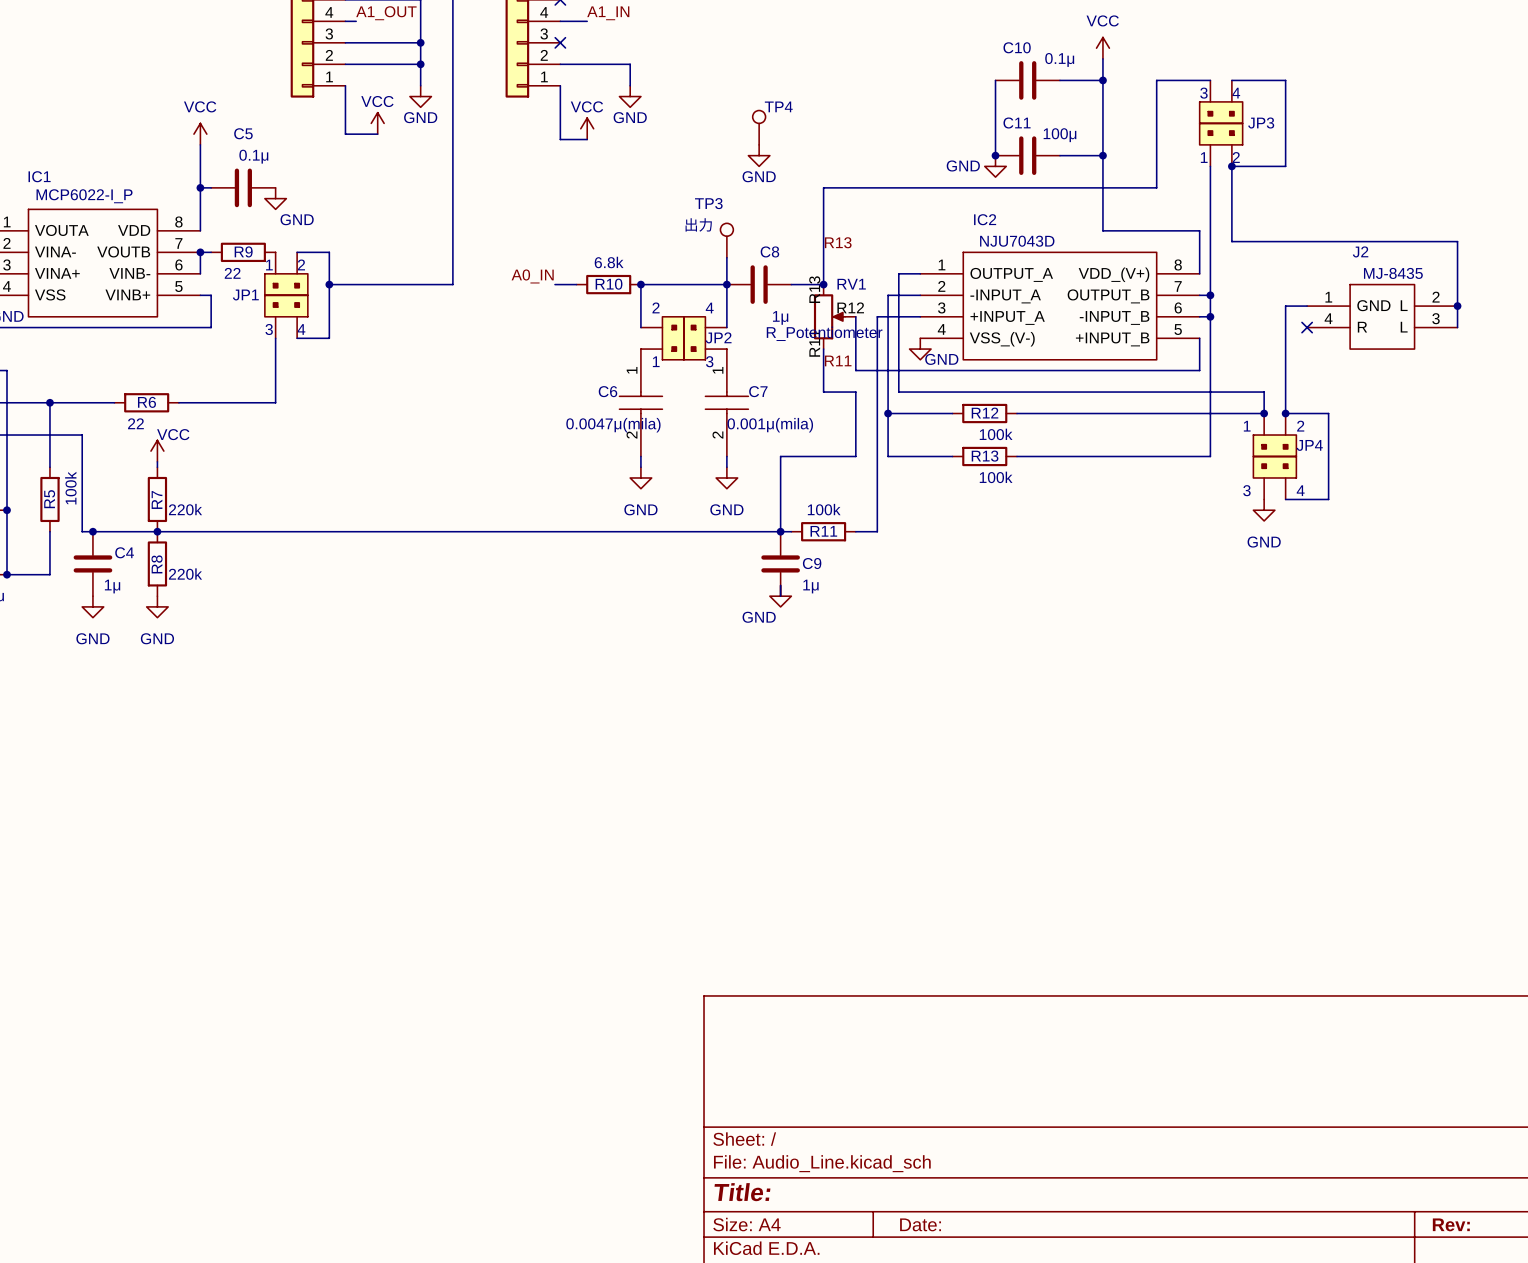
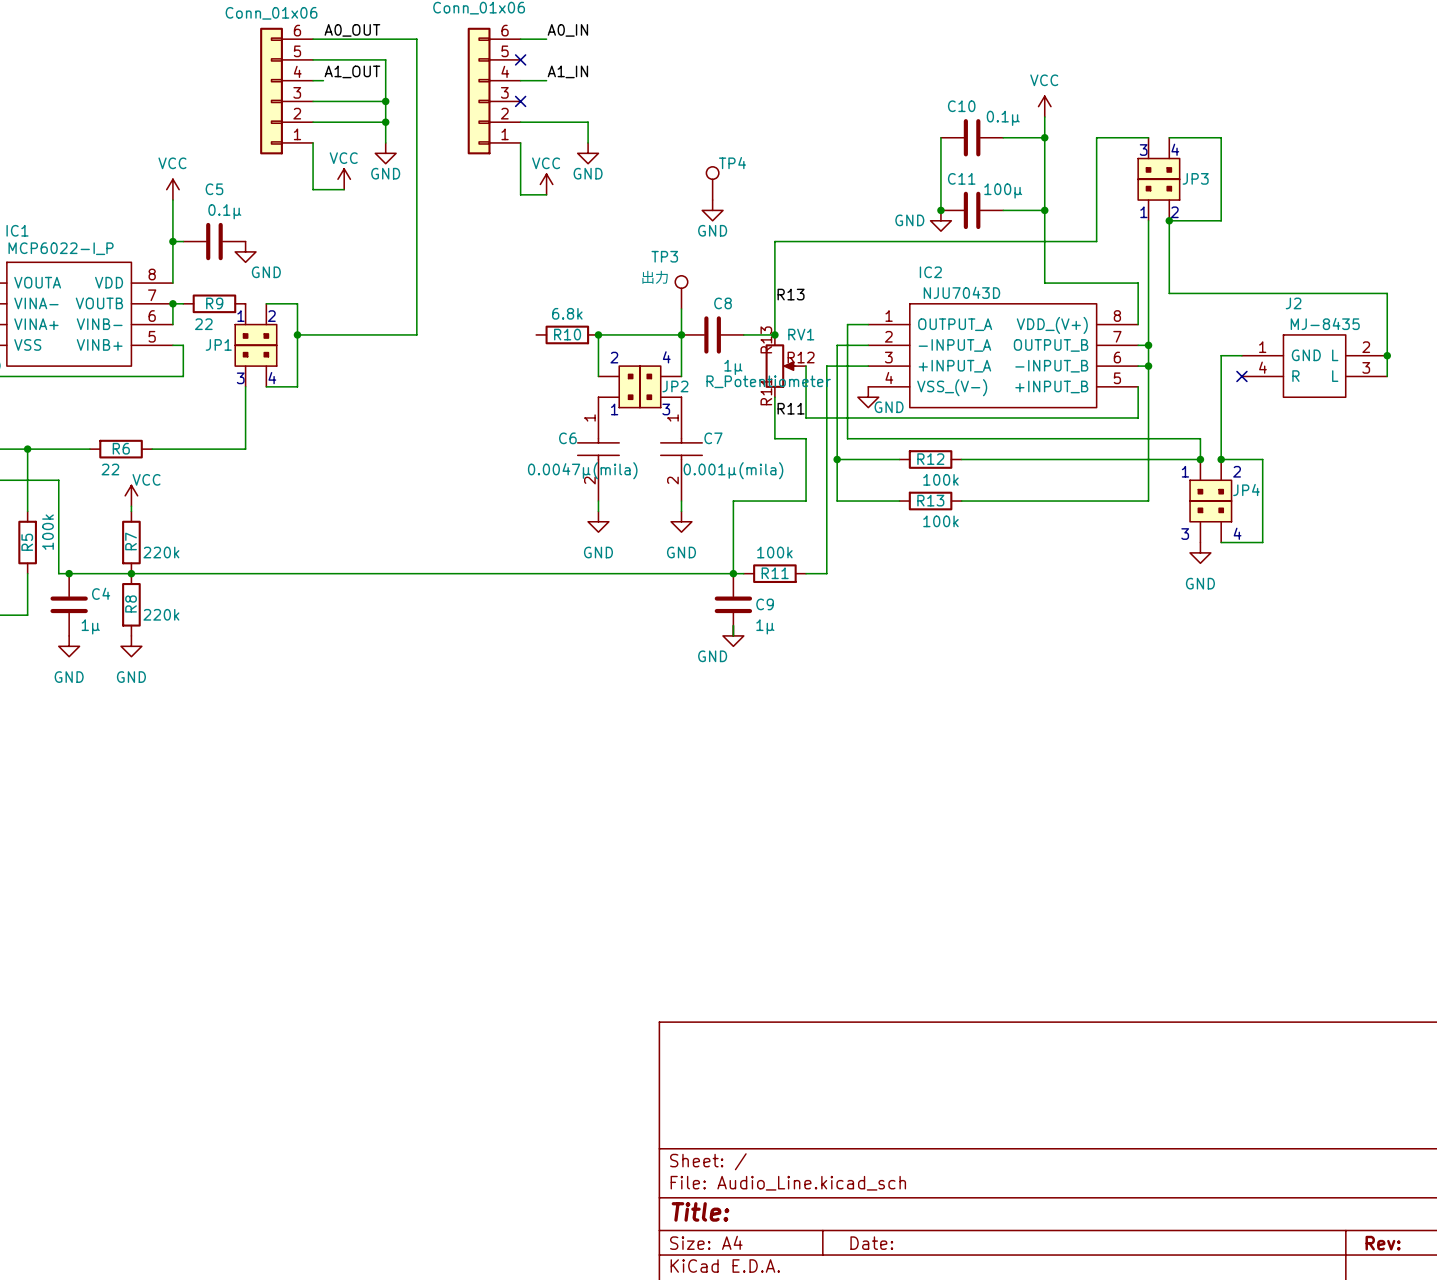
label: A0_IN (532, 276) -> none
wire: (554, 284) (576, 284) -> none

